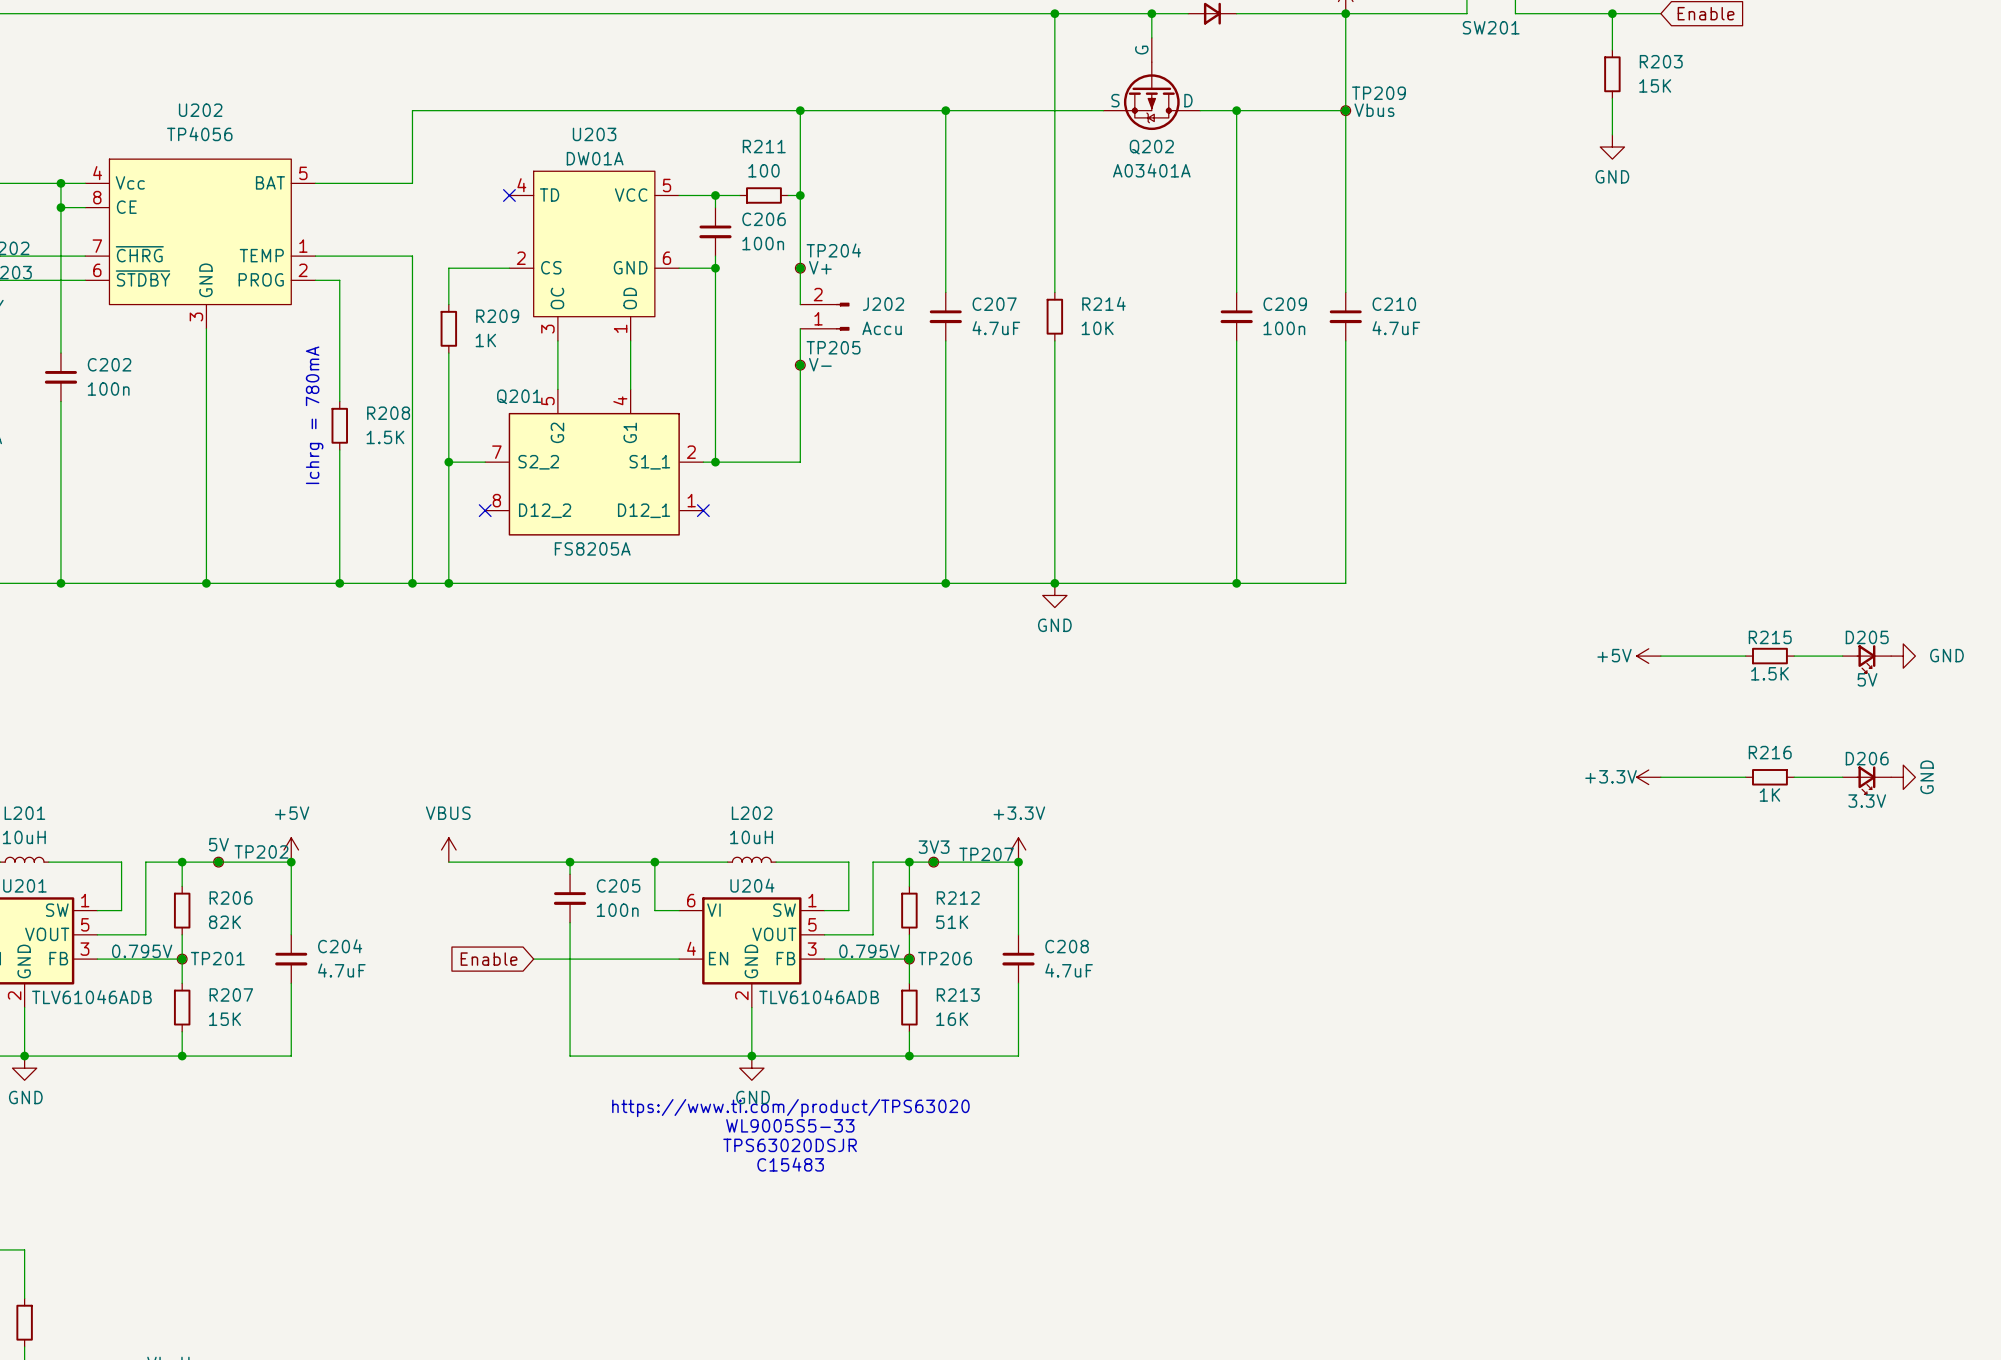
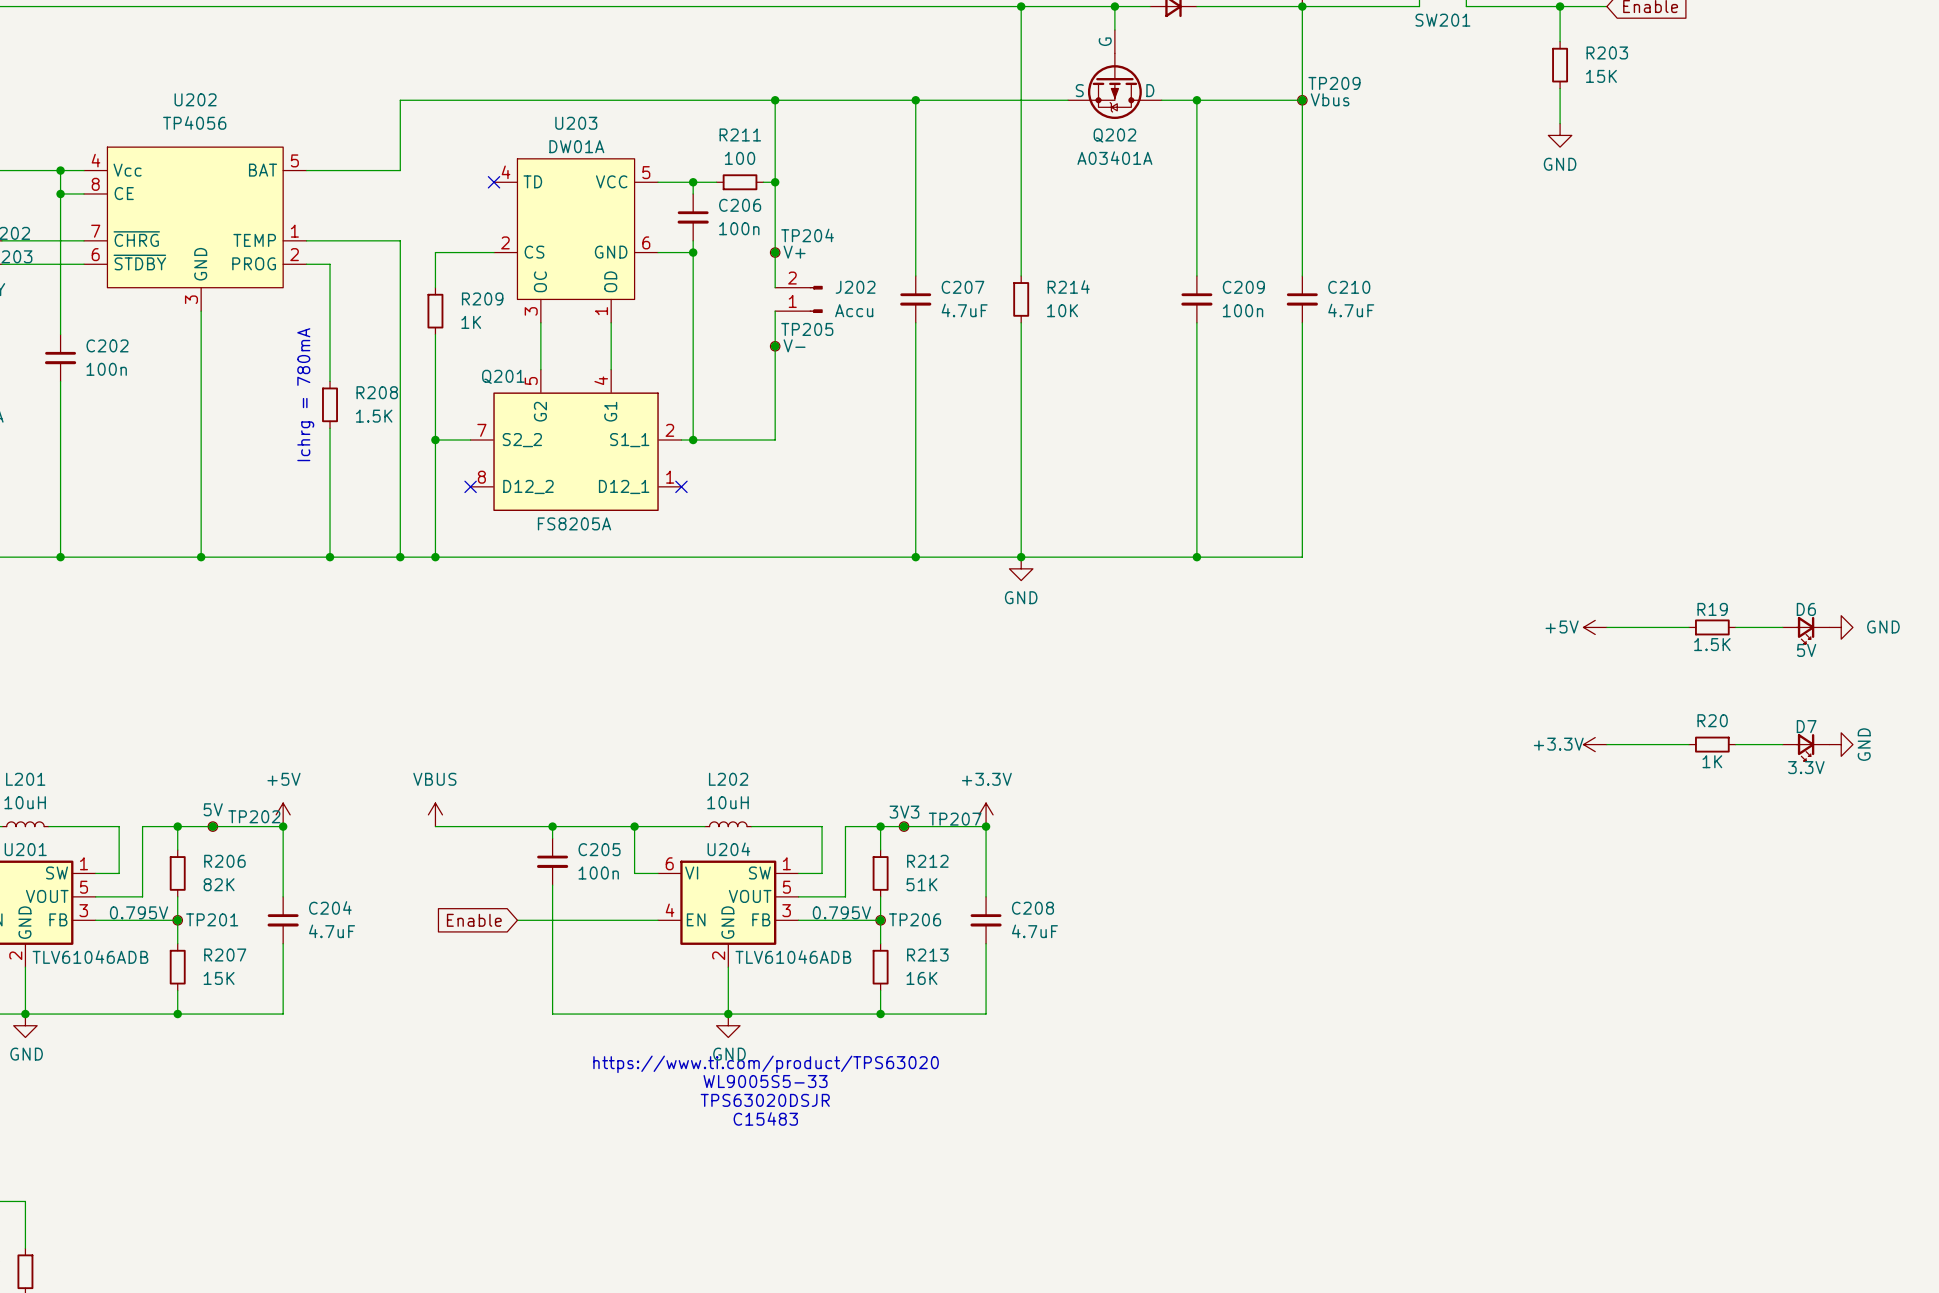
R215 name: R215 (1770, 637) -> R19 (1712, 609)
D205 name: D205 (1867, 637) -> D6 (1806, 609)
R216 name: R216 (1770, 752) -> R20 (1712, 720)
D206 name: D206 (1867, 758) -> D7 (1806, 726)

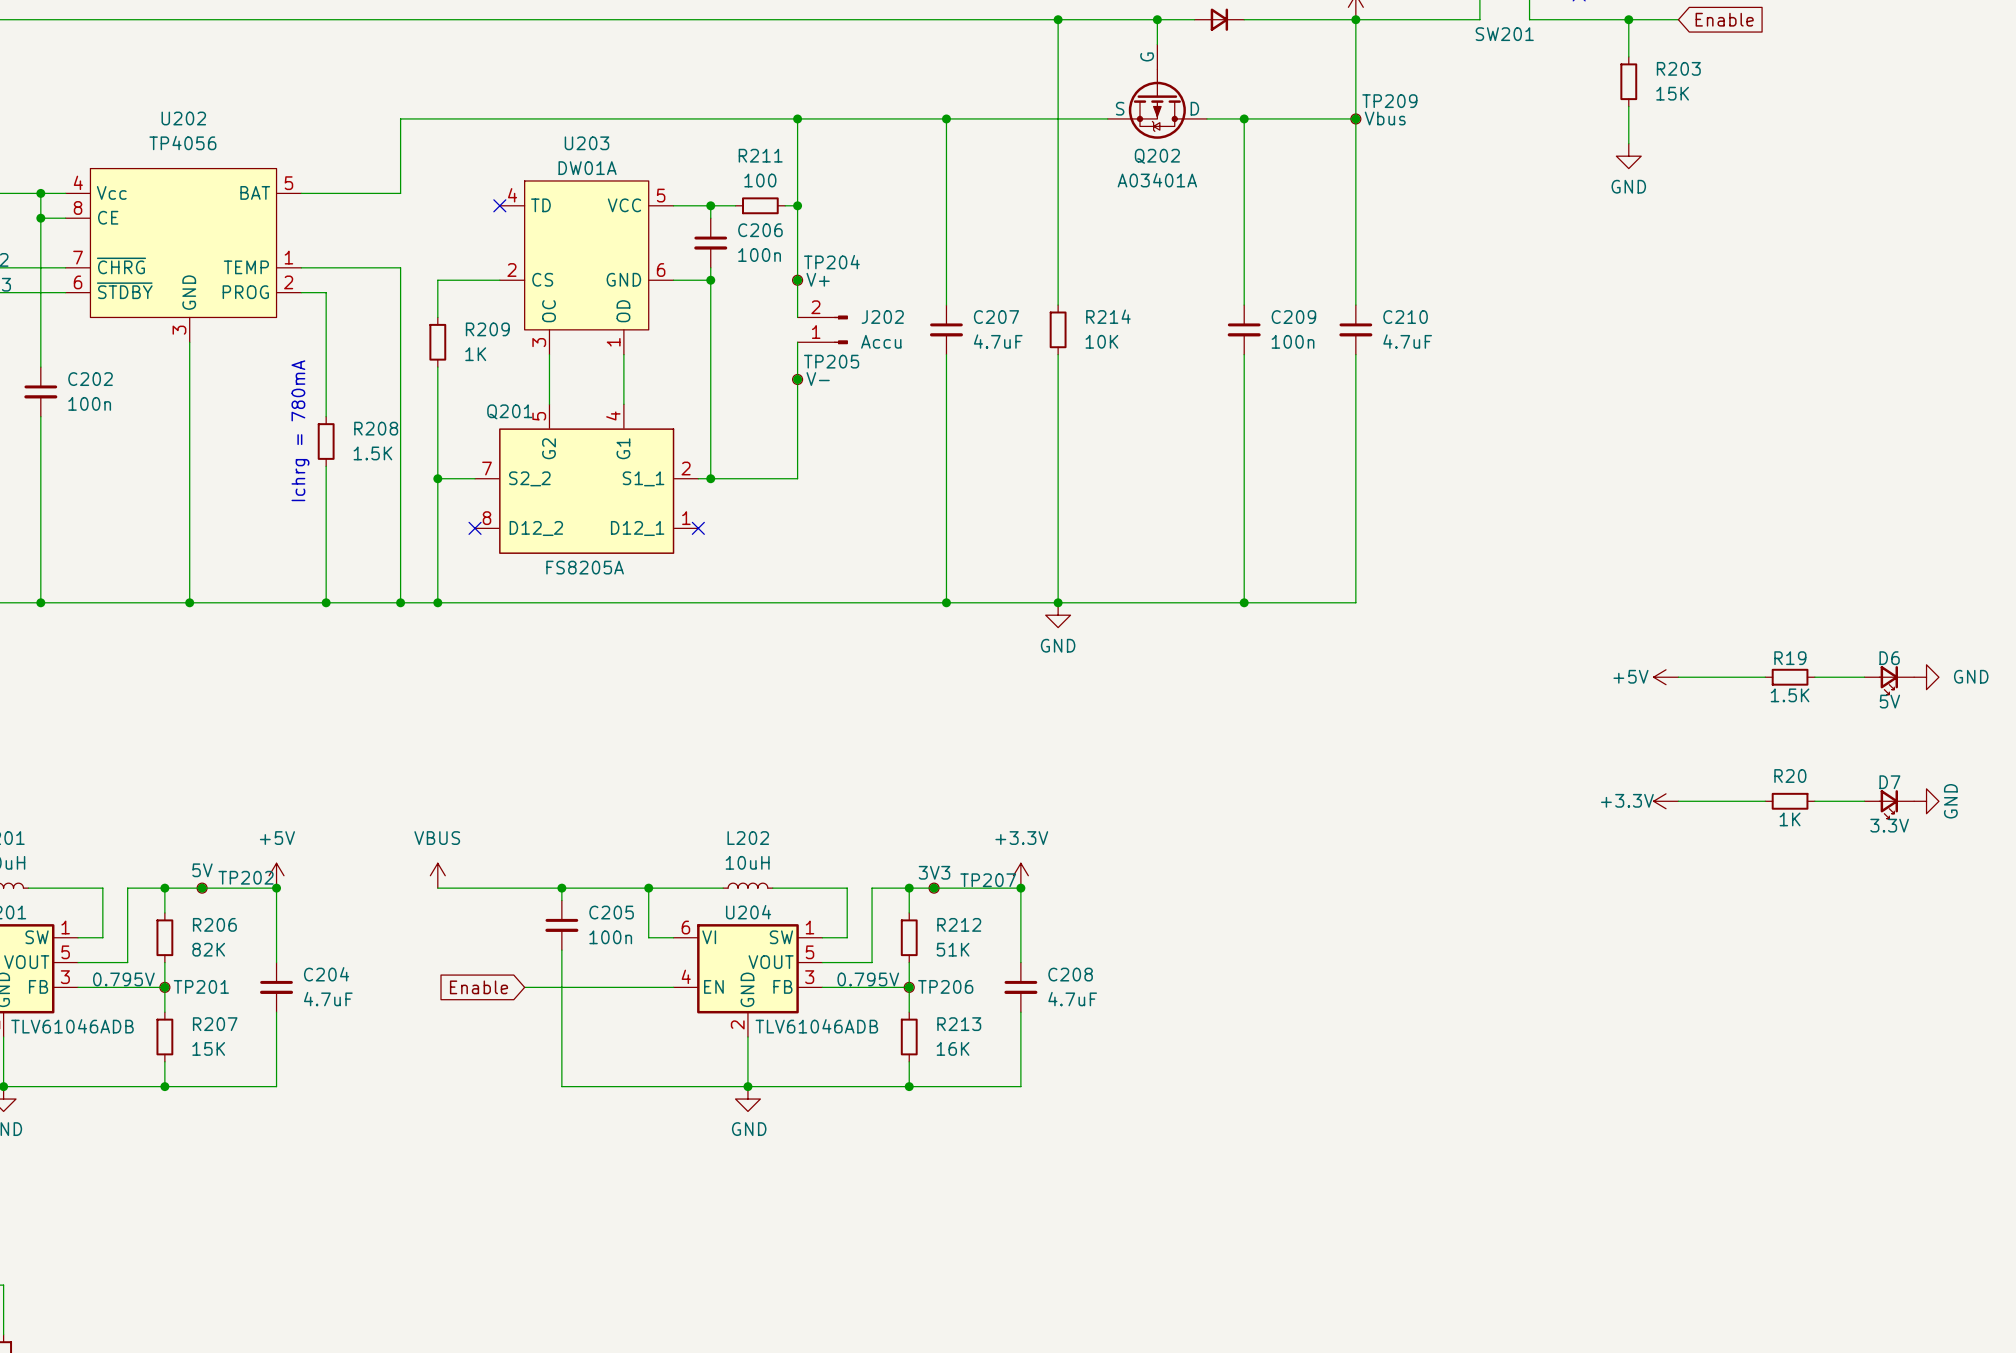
text: https://www.ti.com/product/TPS63020 (766, 1064) -> none
text: WL9005S5-33 (765, 1081) -> none
text: TPS63020DSJR (765, 1100) -> none
text: C15483 (765, 1118) -> none

